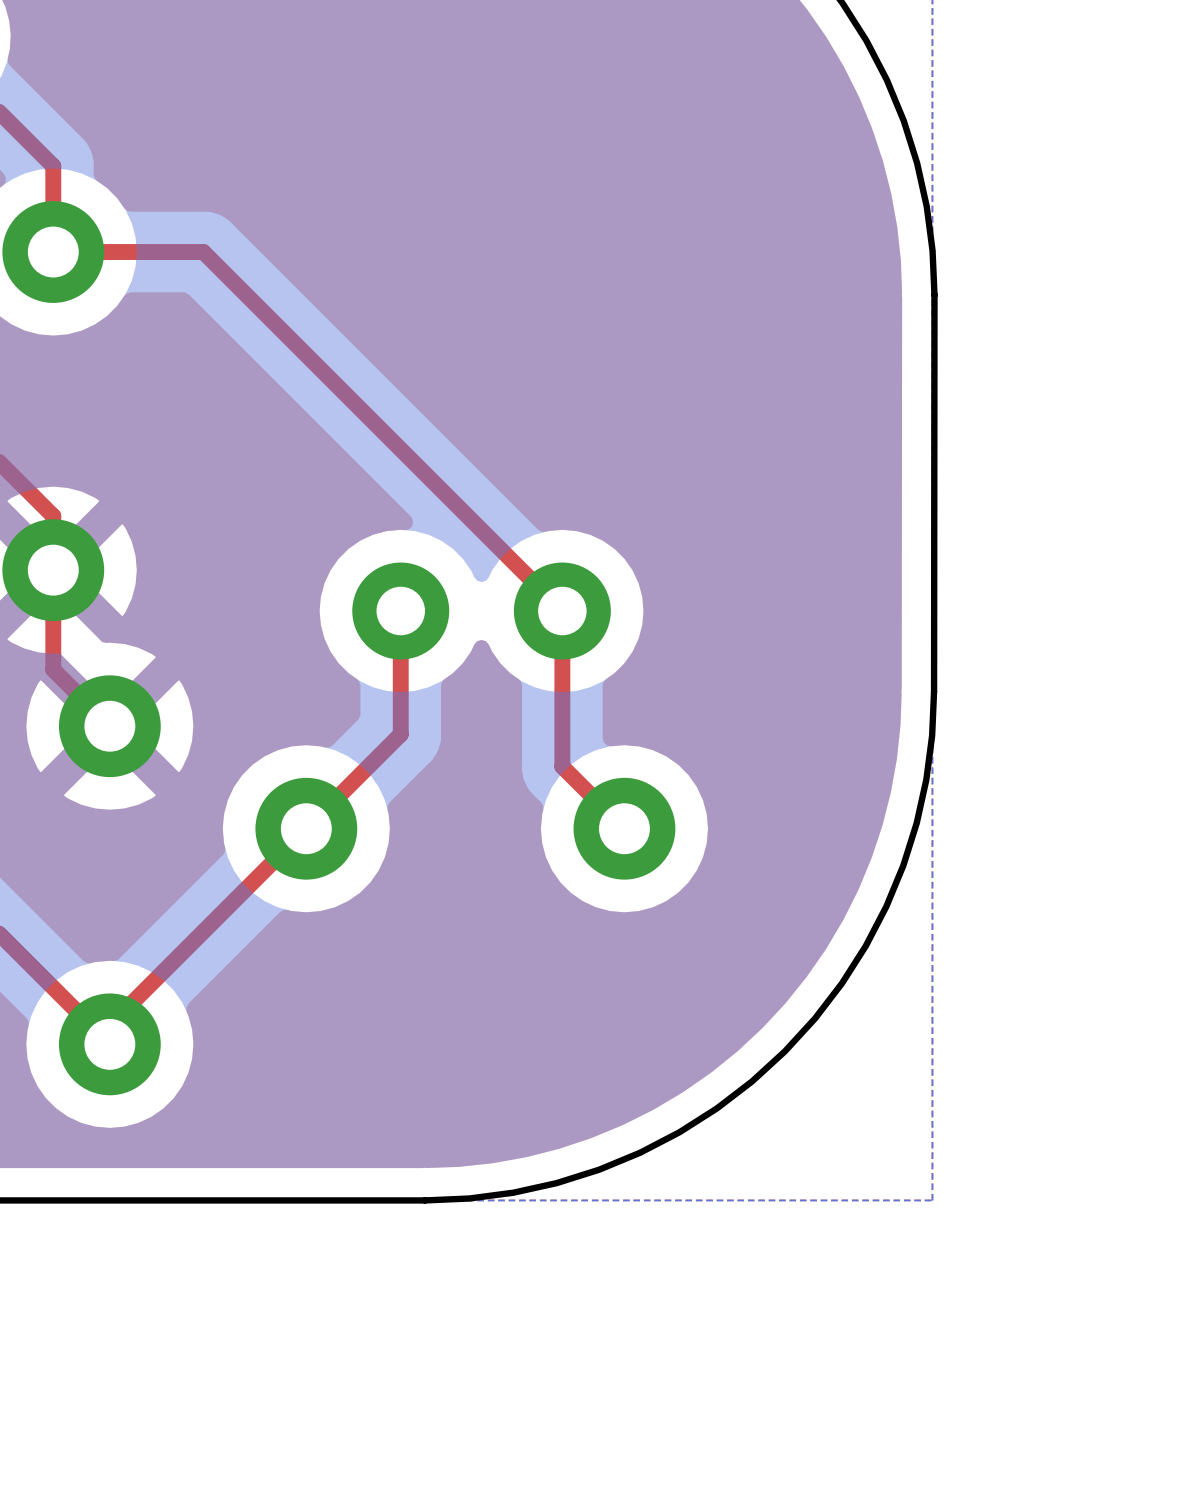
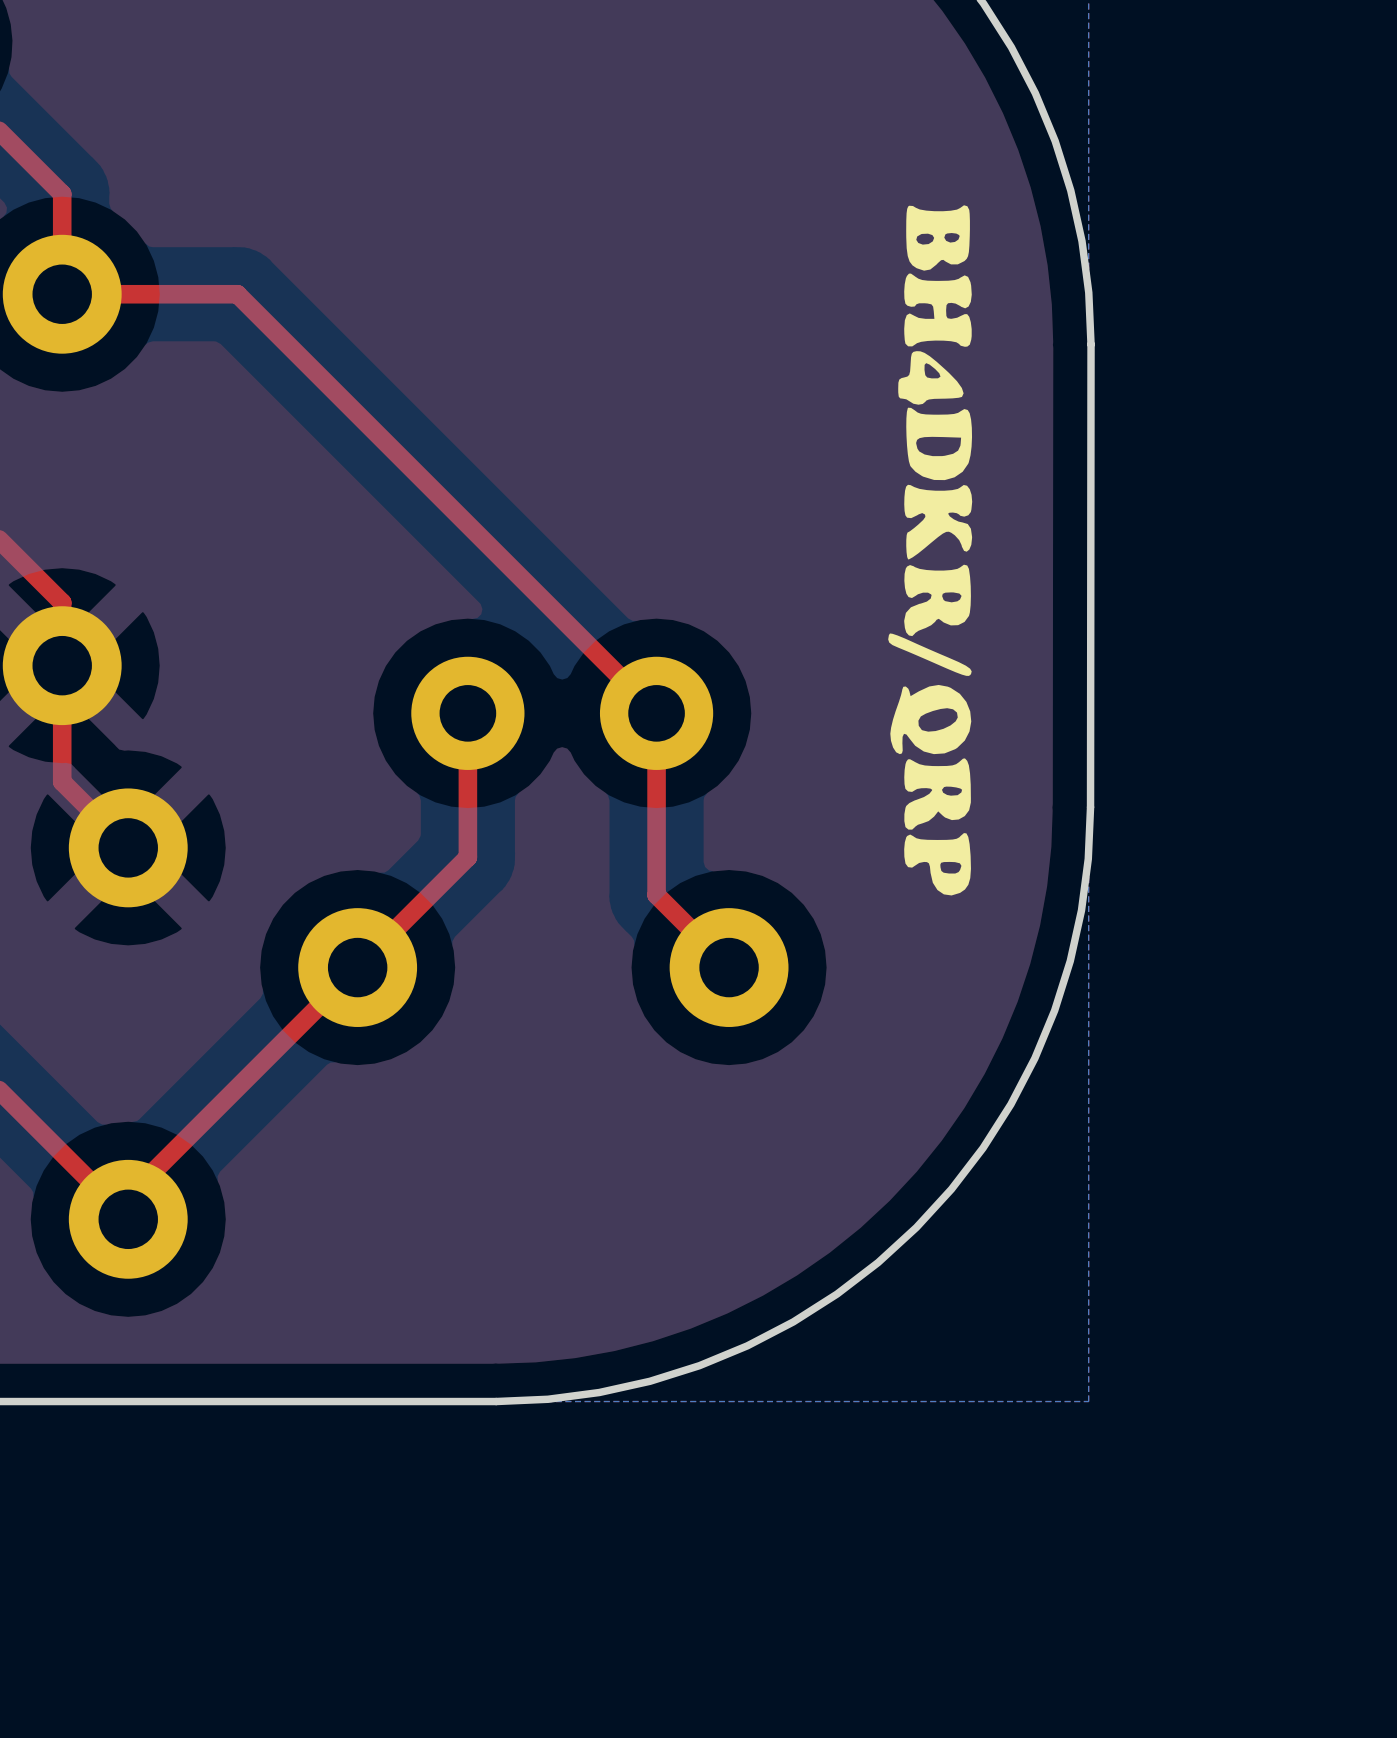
drawing: none -> [888, 205, 973, 896]

